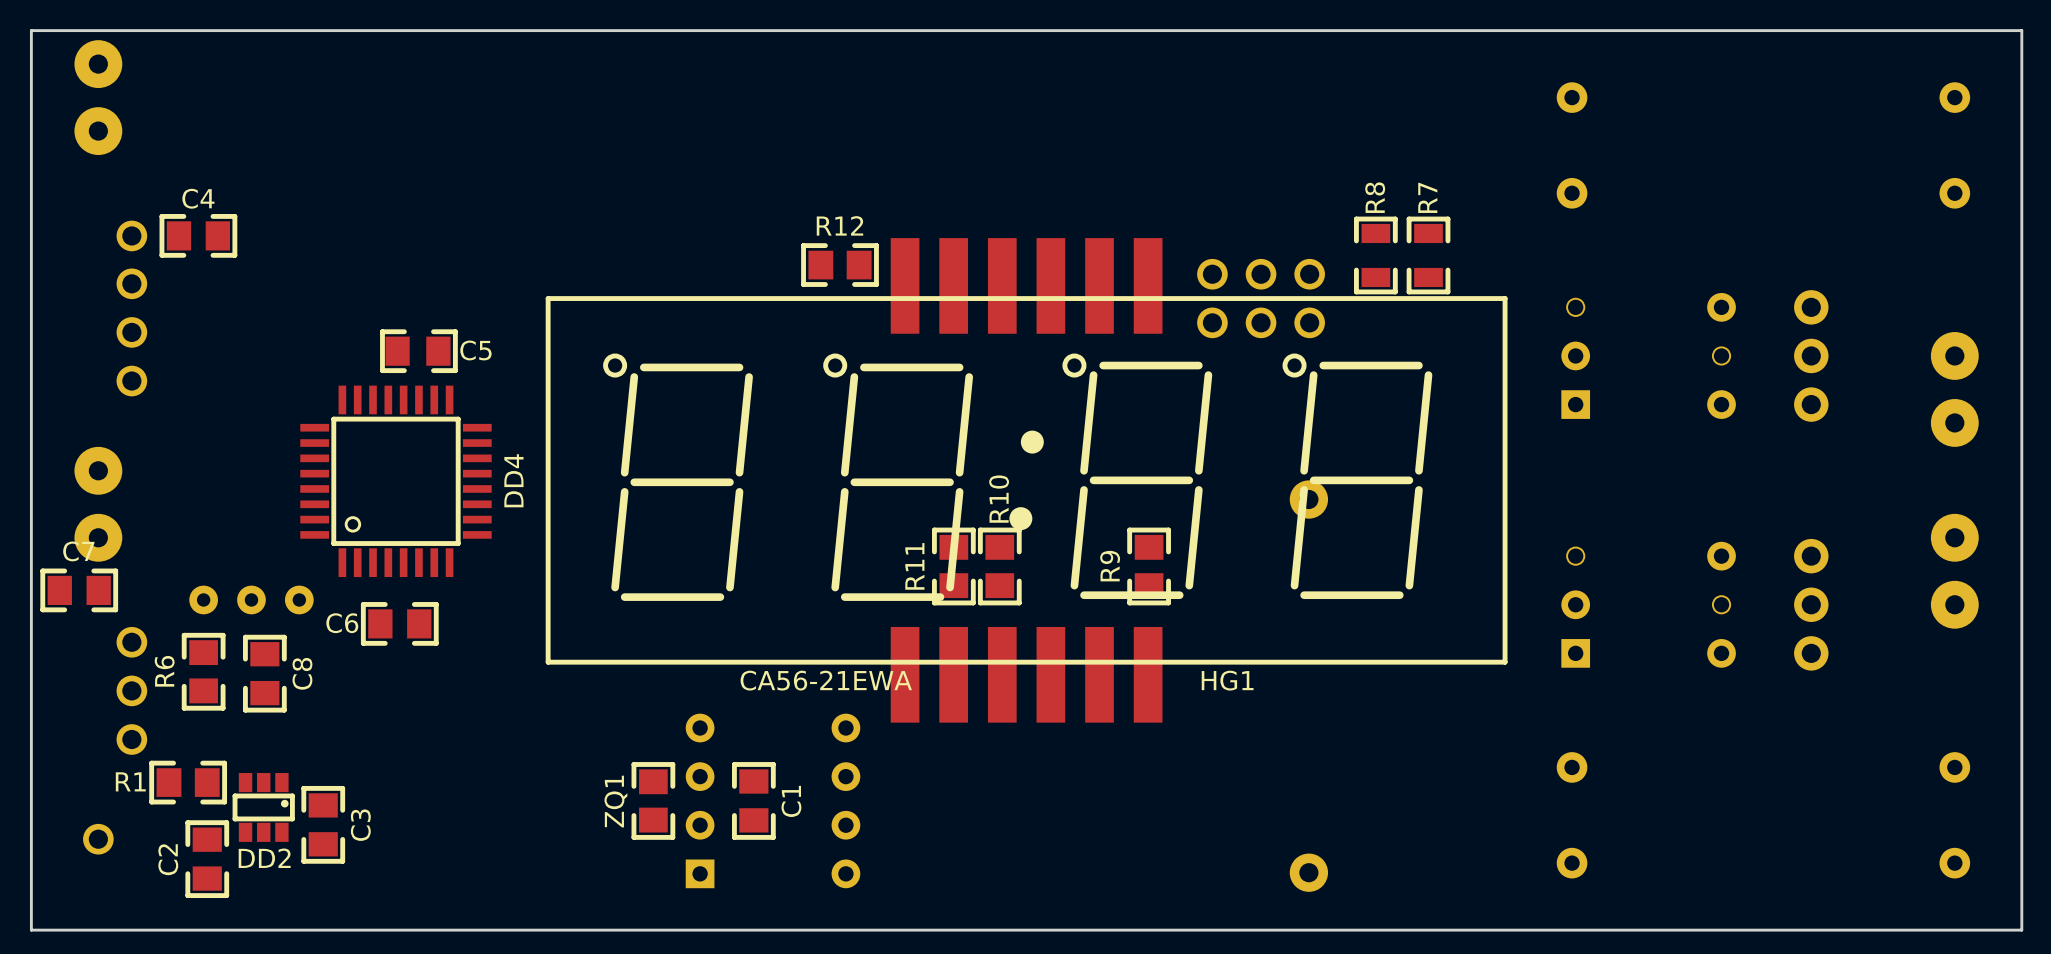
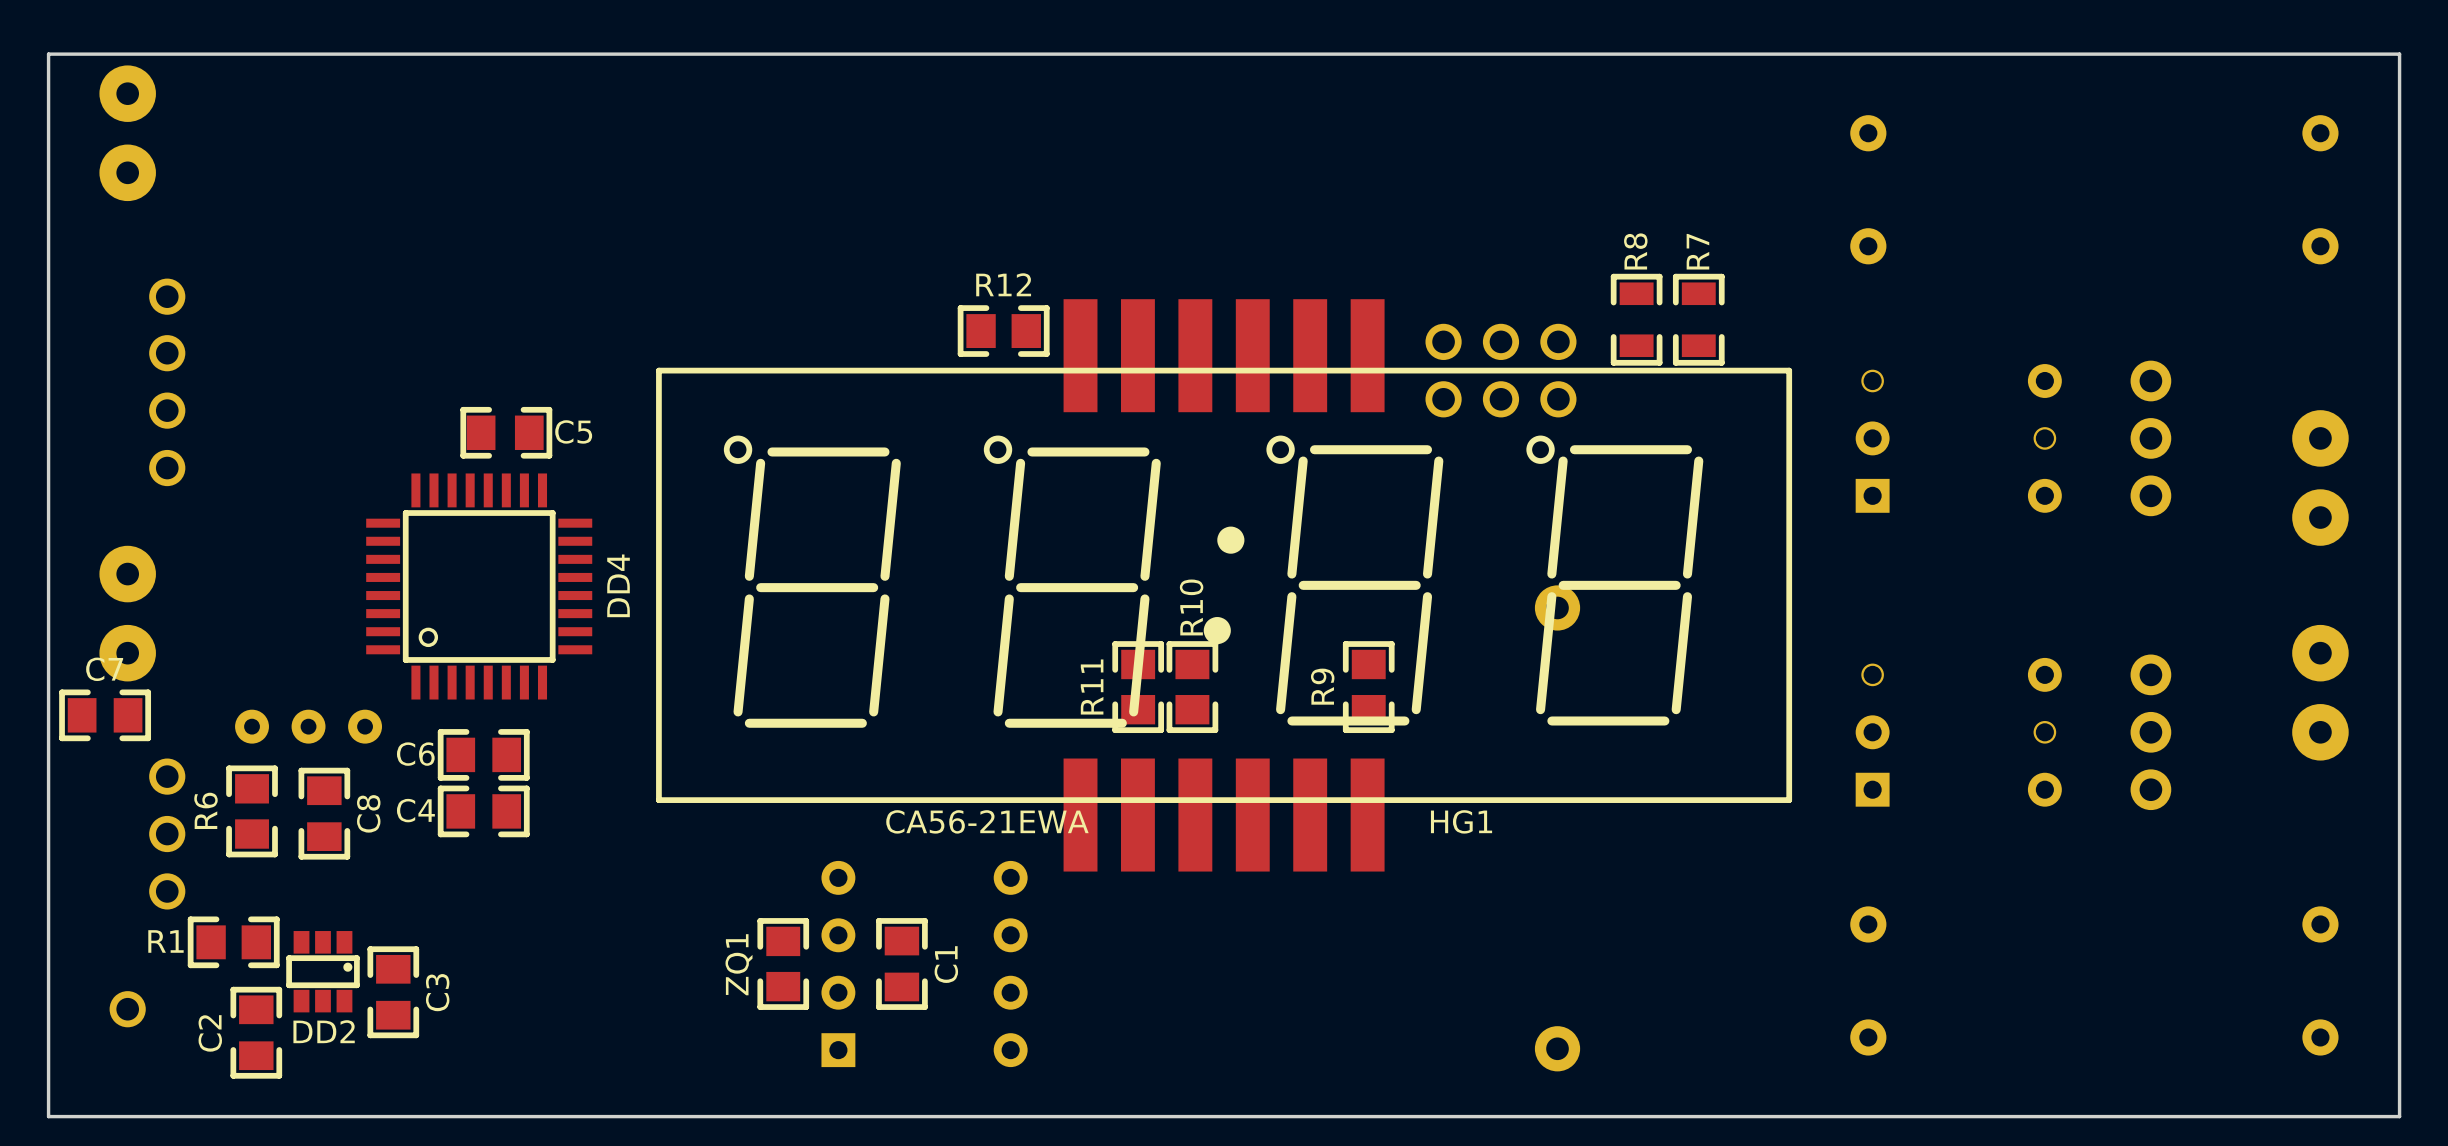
C4 name position: C4 (198, 198) -> C4 (415, 810)
C4 position: (198, 235) -> (483, 811)

